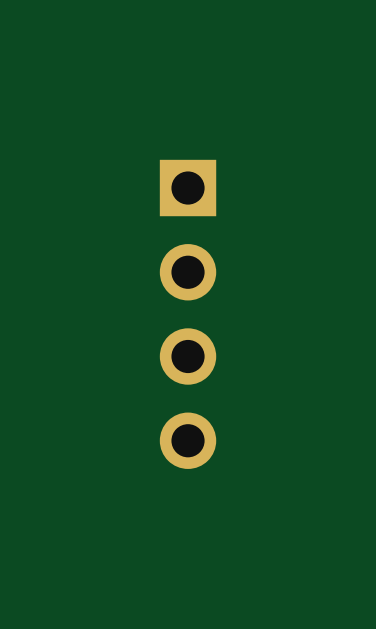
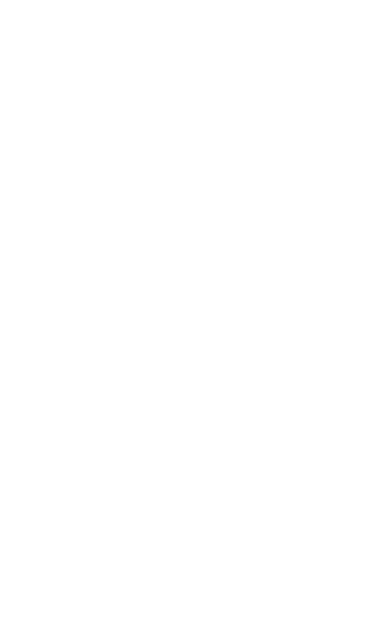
part: (188, 314) -> none

